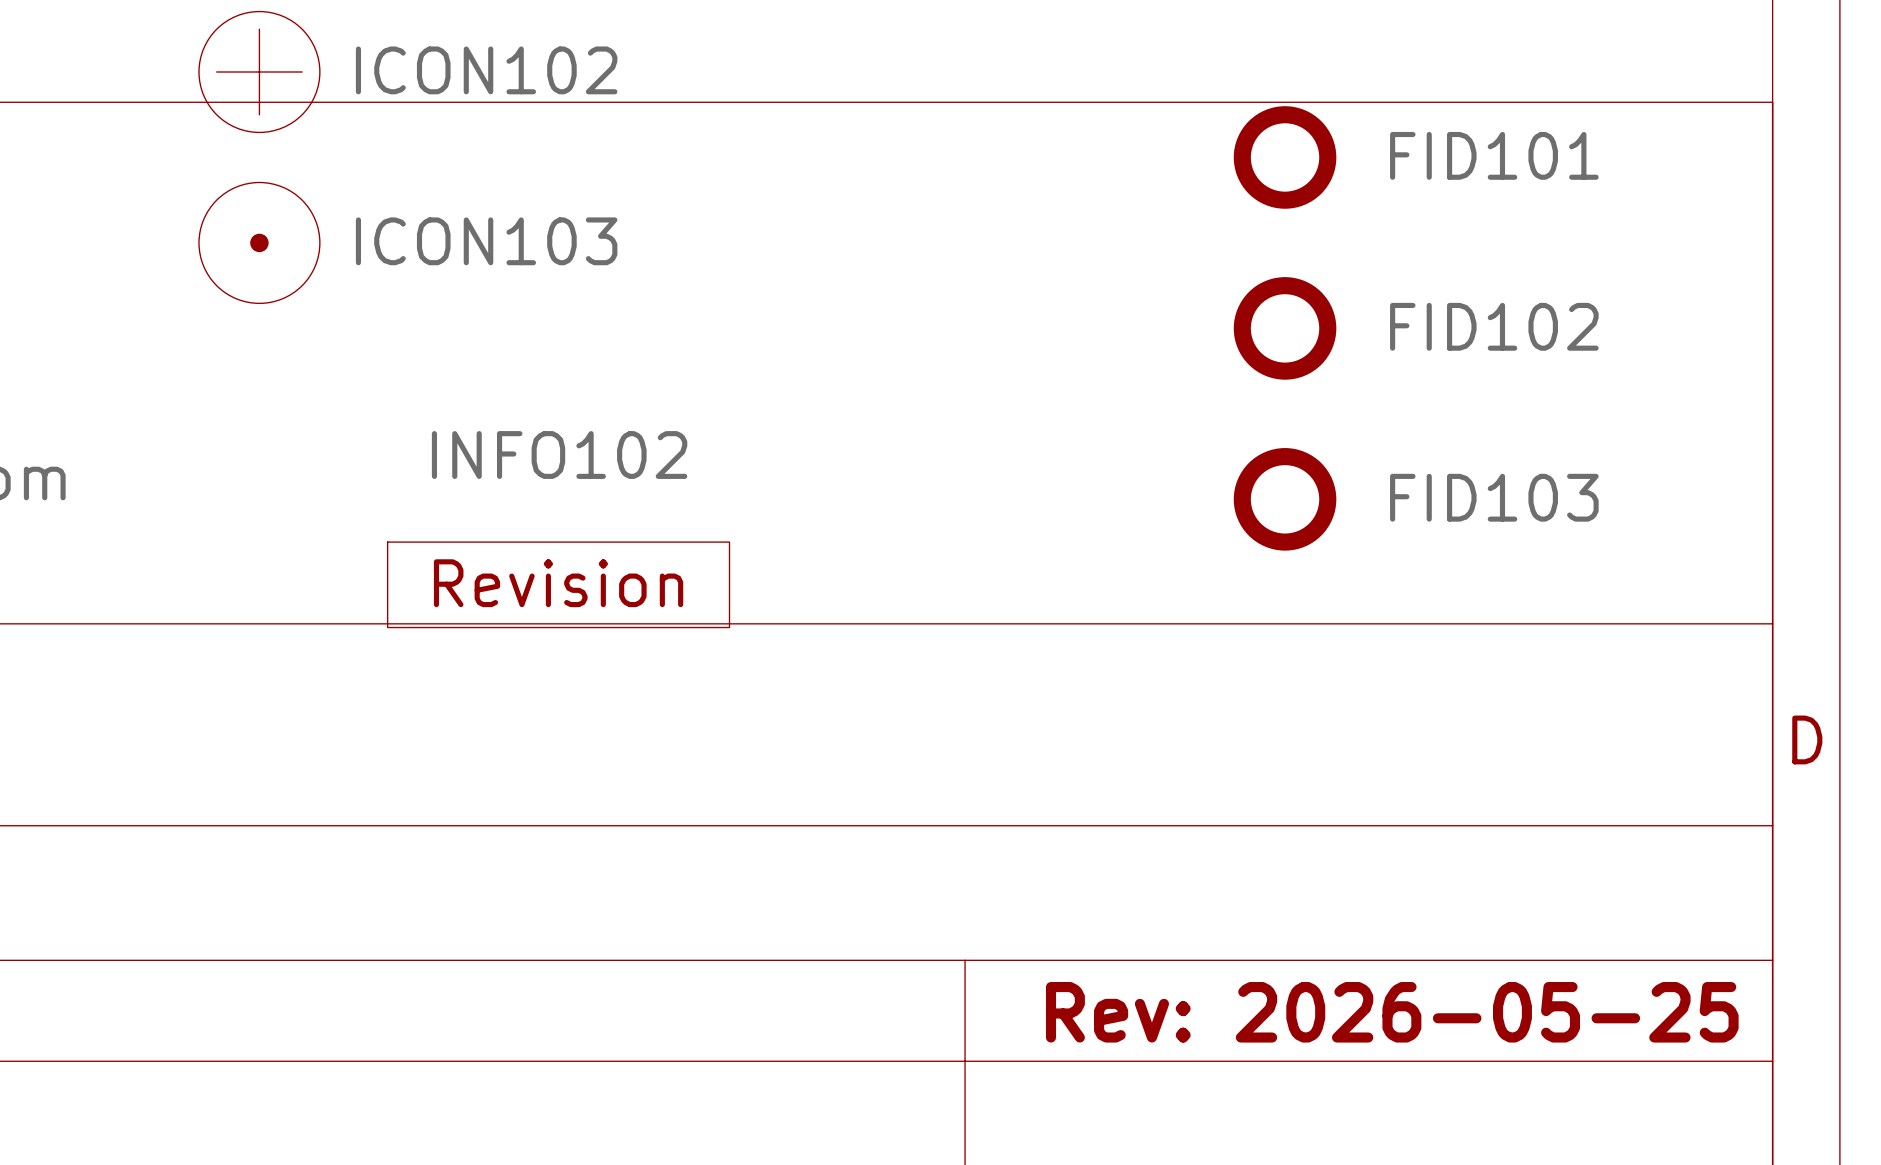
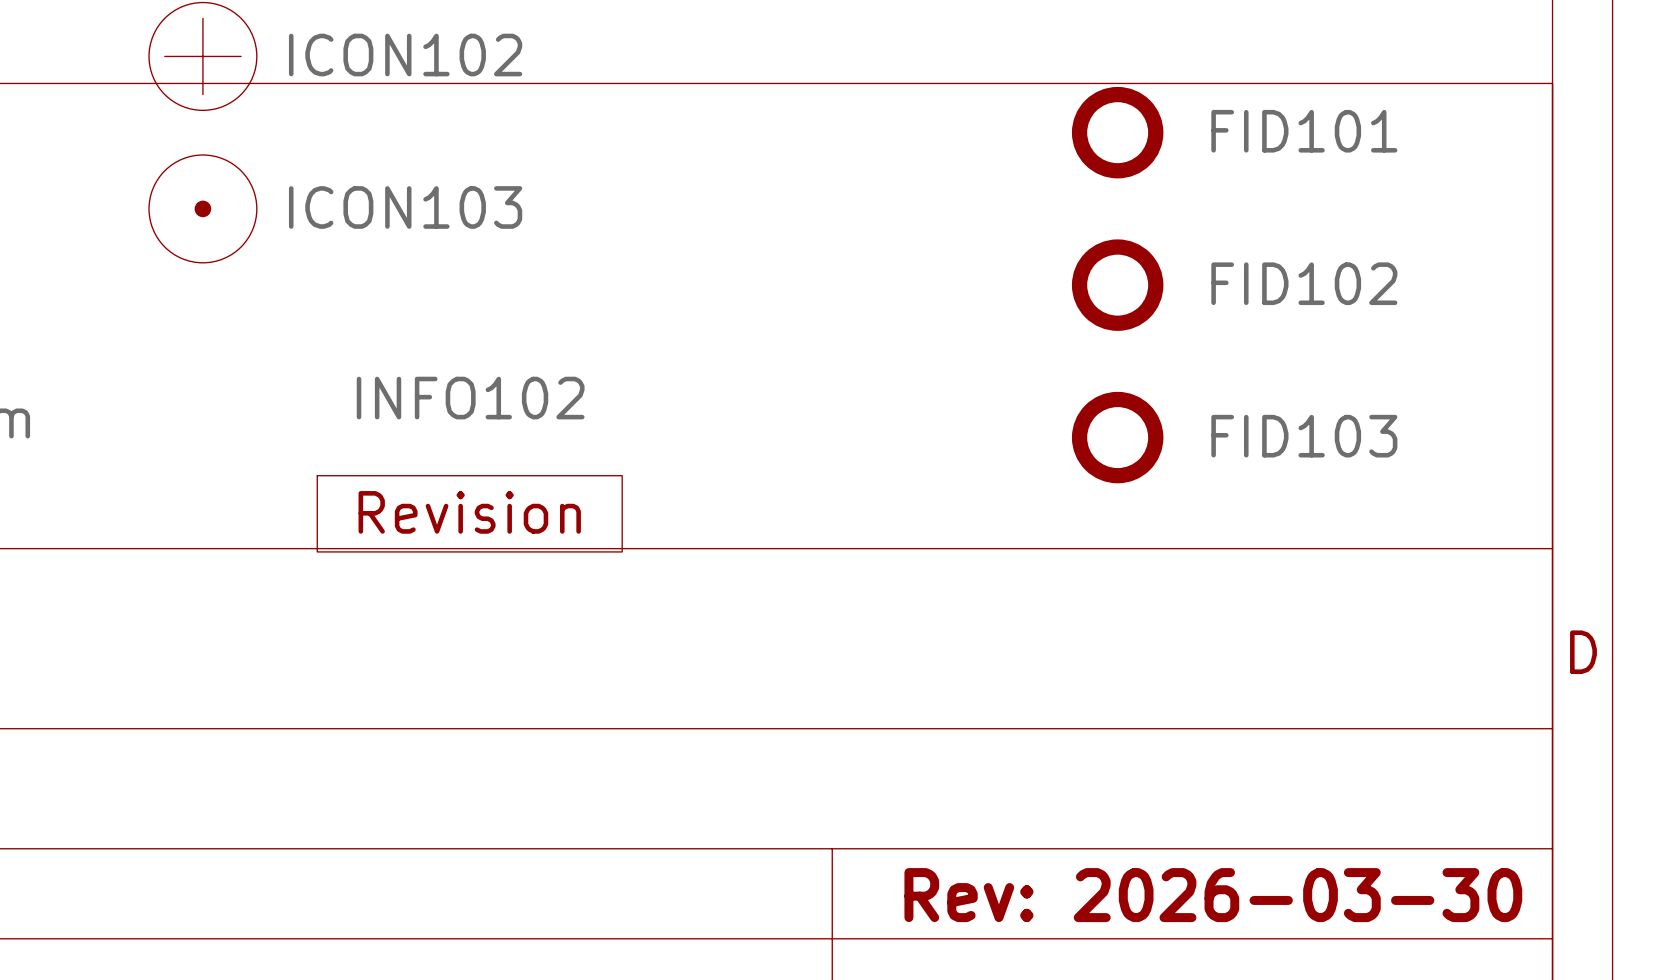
title block: Rev: 2026-05-25 (1392, 1012) -> Rev: 2026-03-30 (1213, 895)

